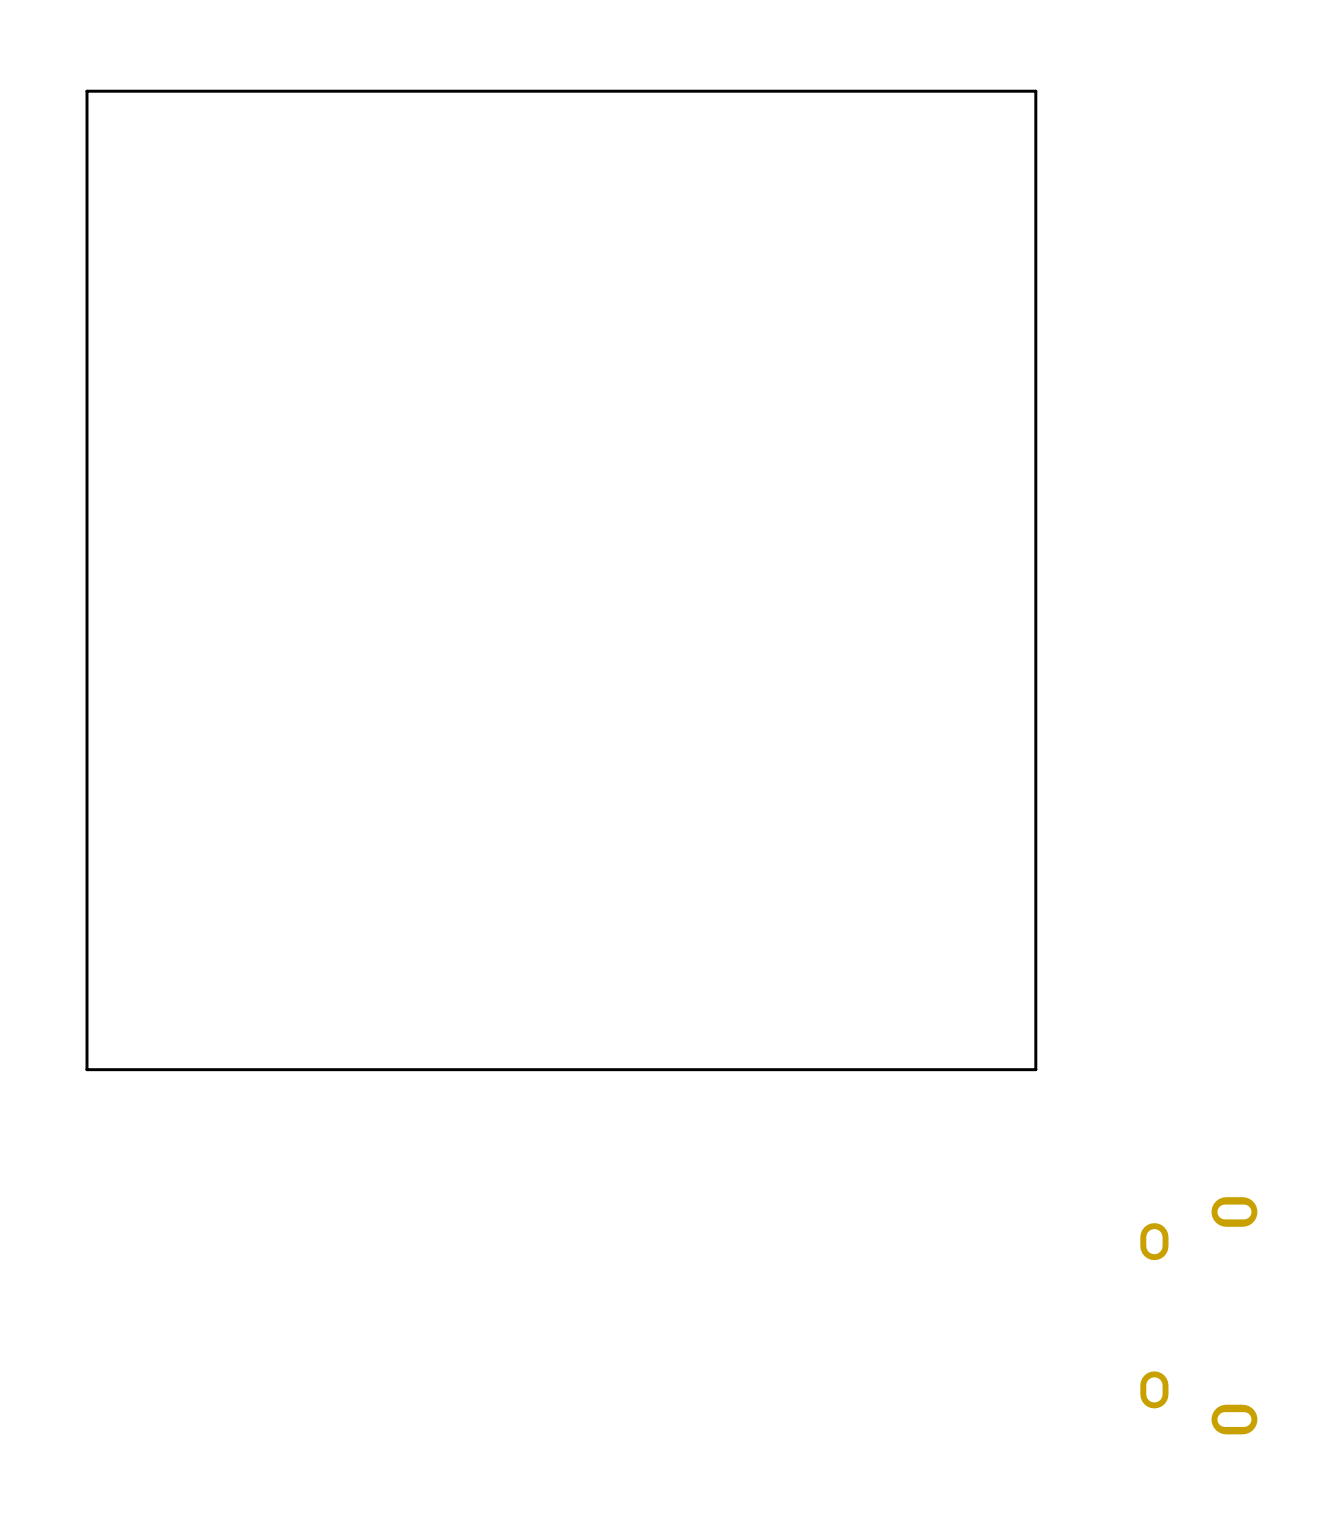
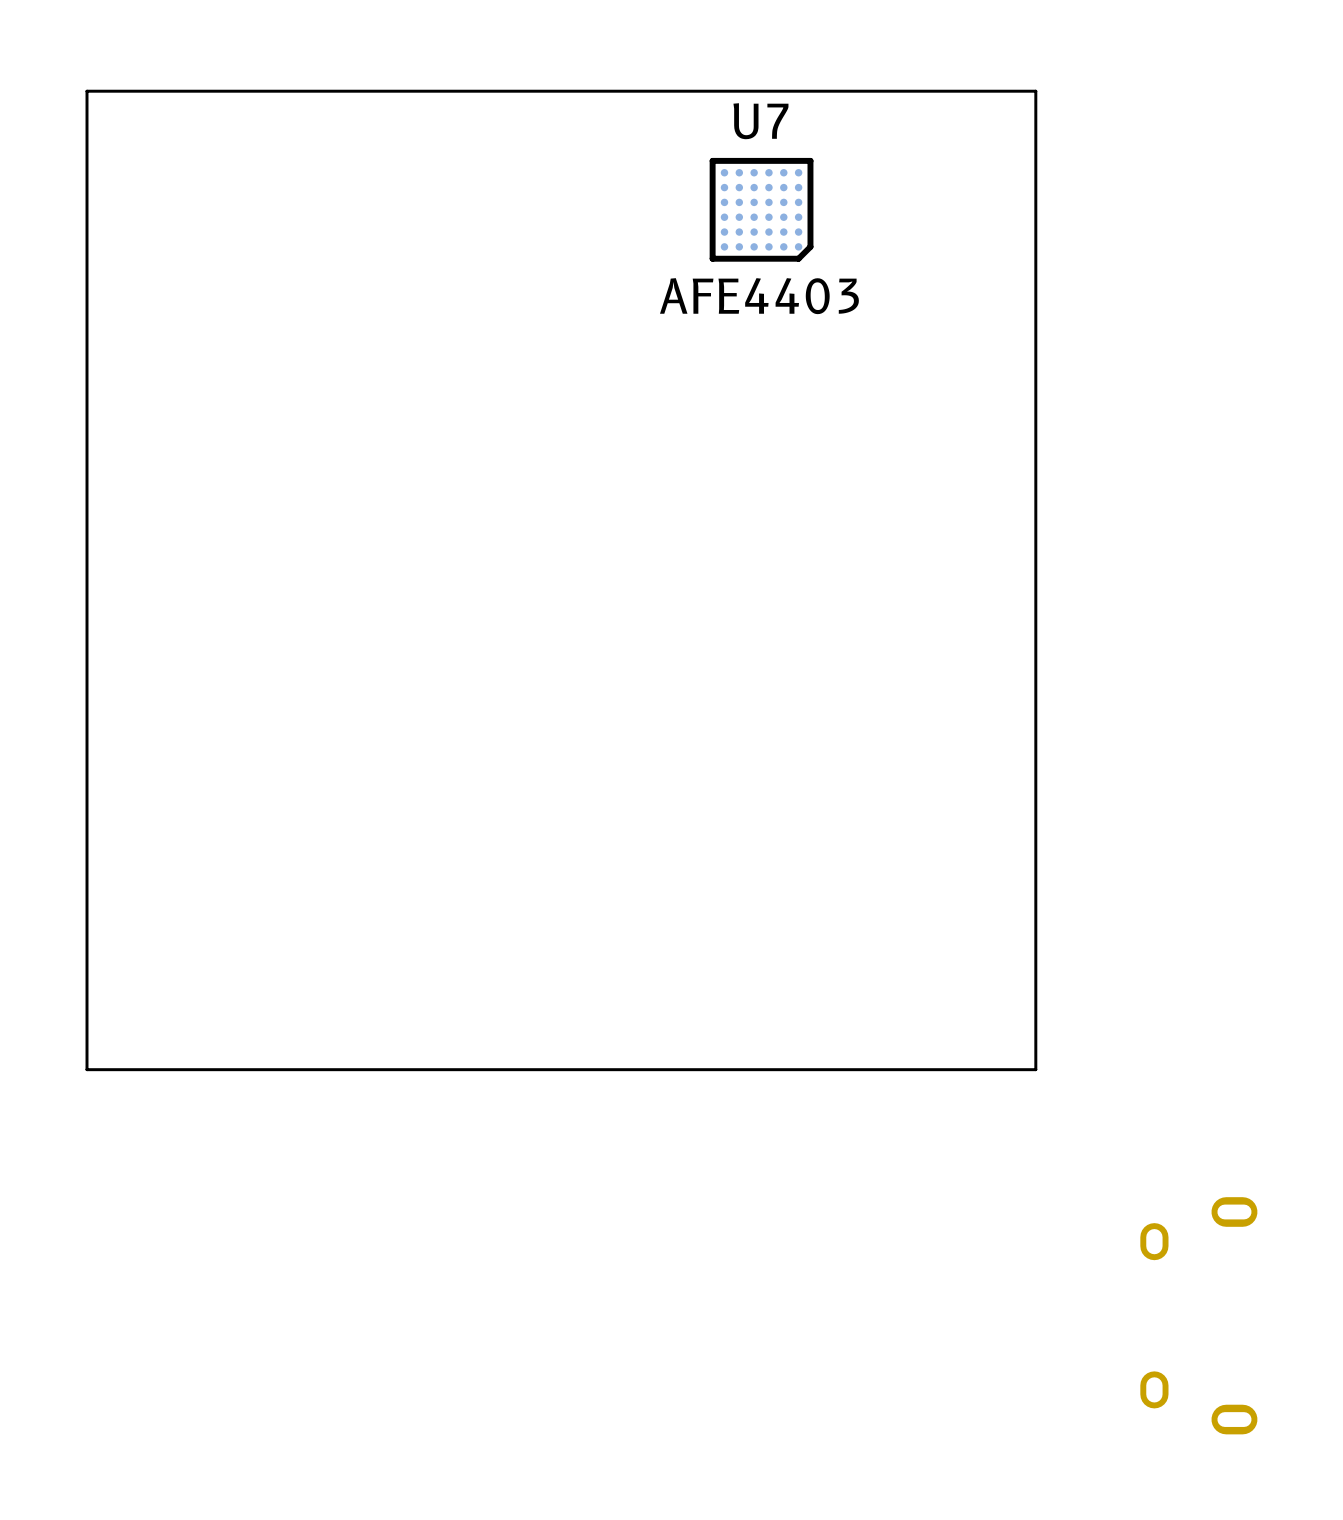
U7: none -> AFE4403 (761, 209)

